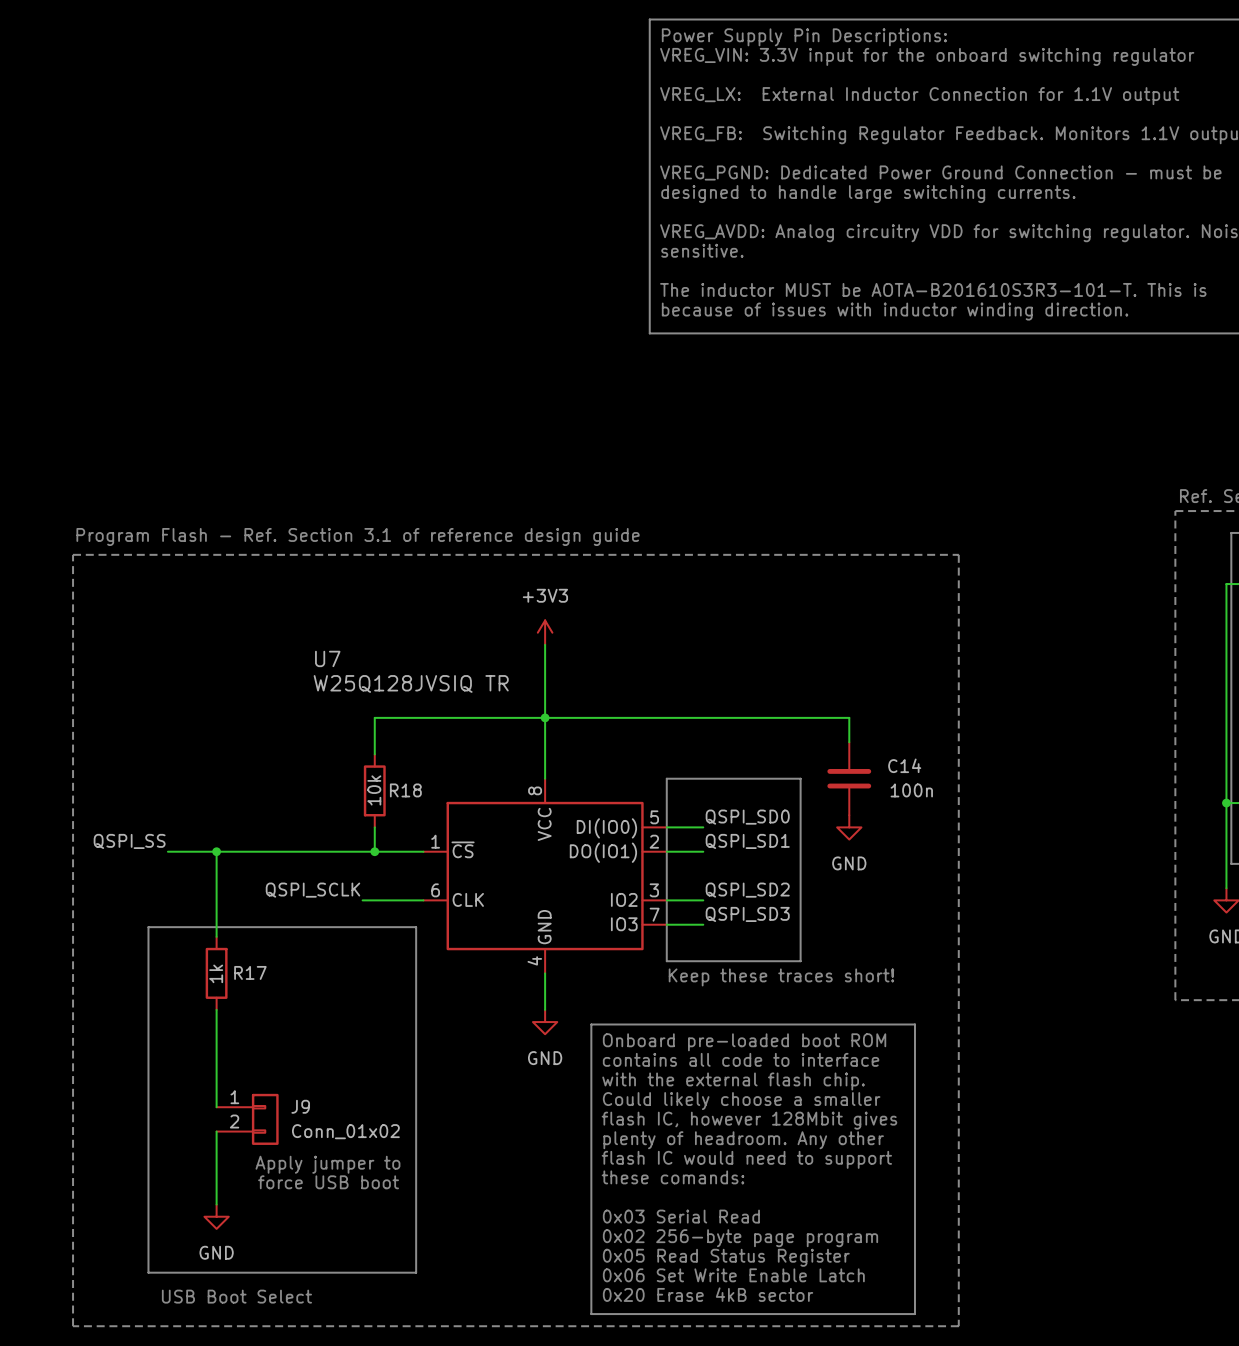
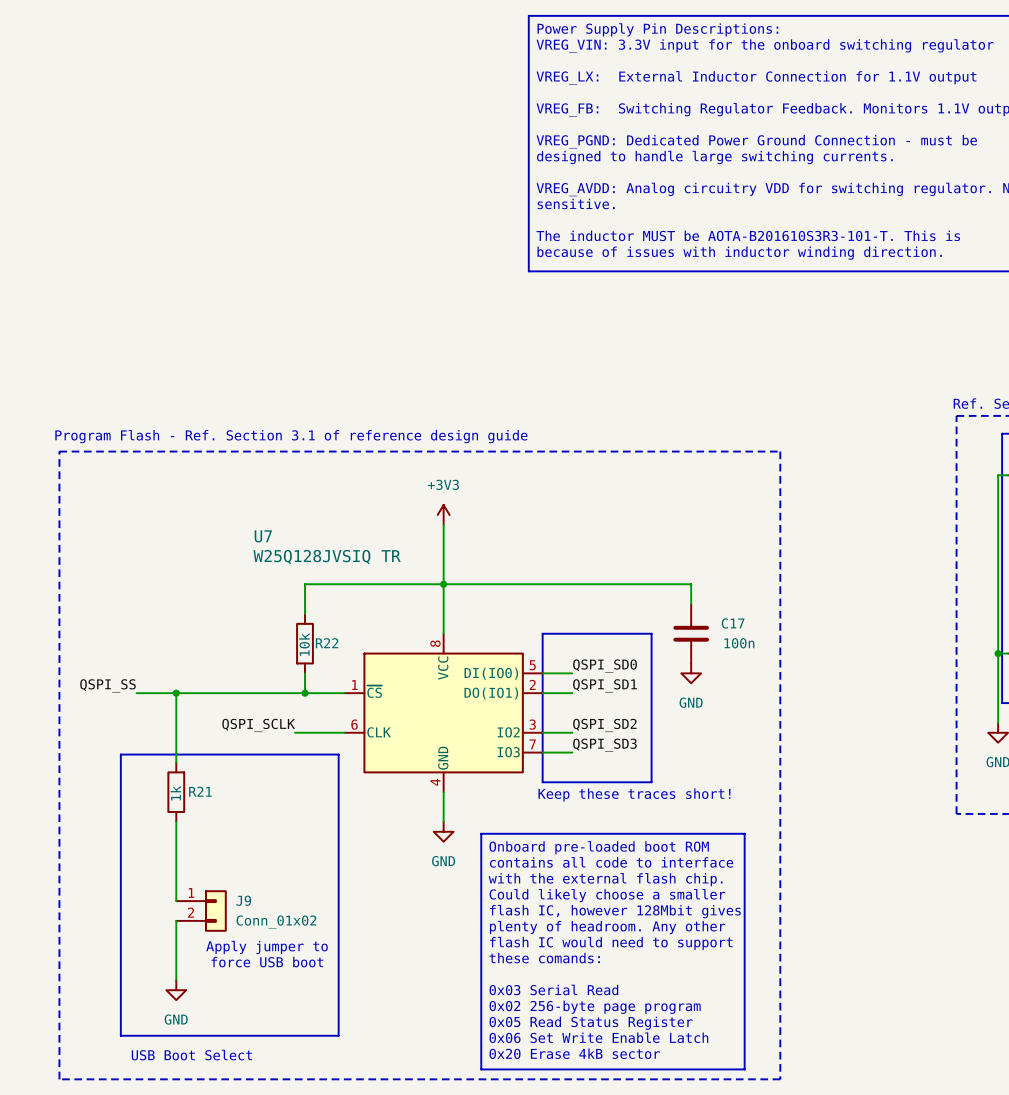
C14 name: C14 (904, 765) -> C17 (733, 623)
R18 name: R18 (405, 790) -> R22 (327, 643)
R17 name: R17 (250, 972) -> R21 (200, 791)

